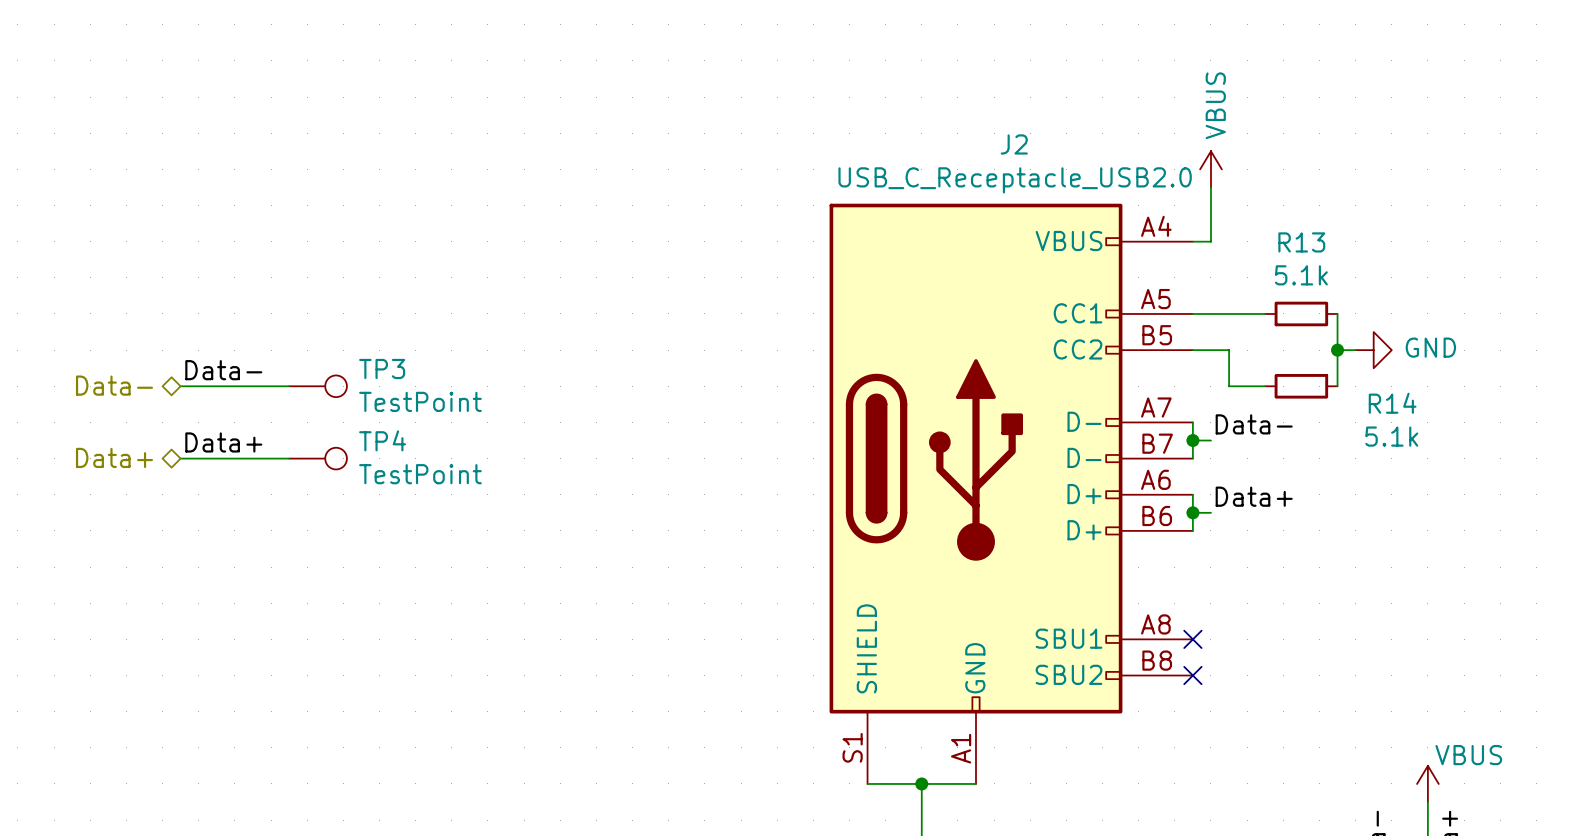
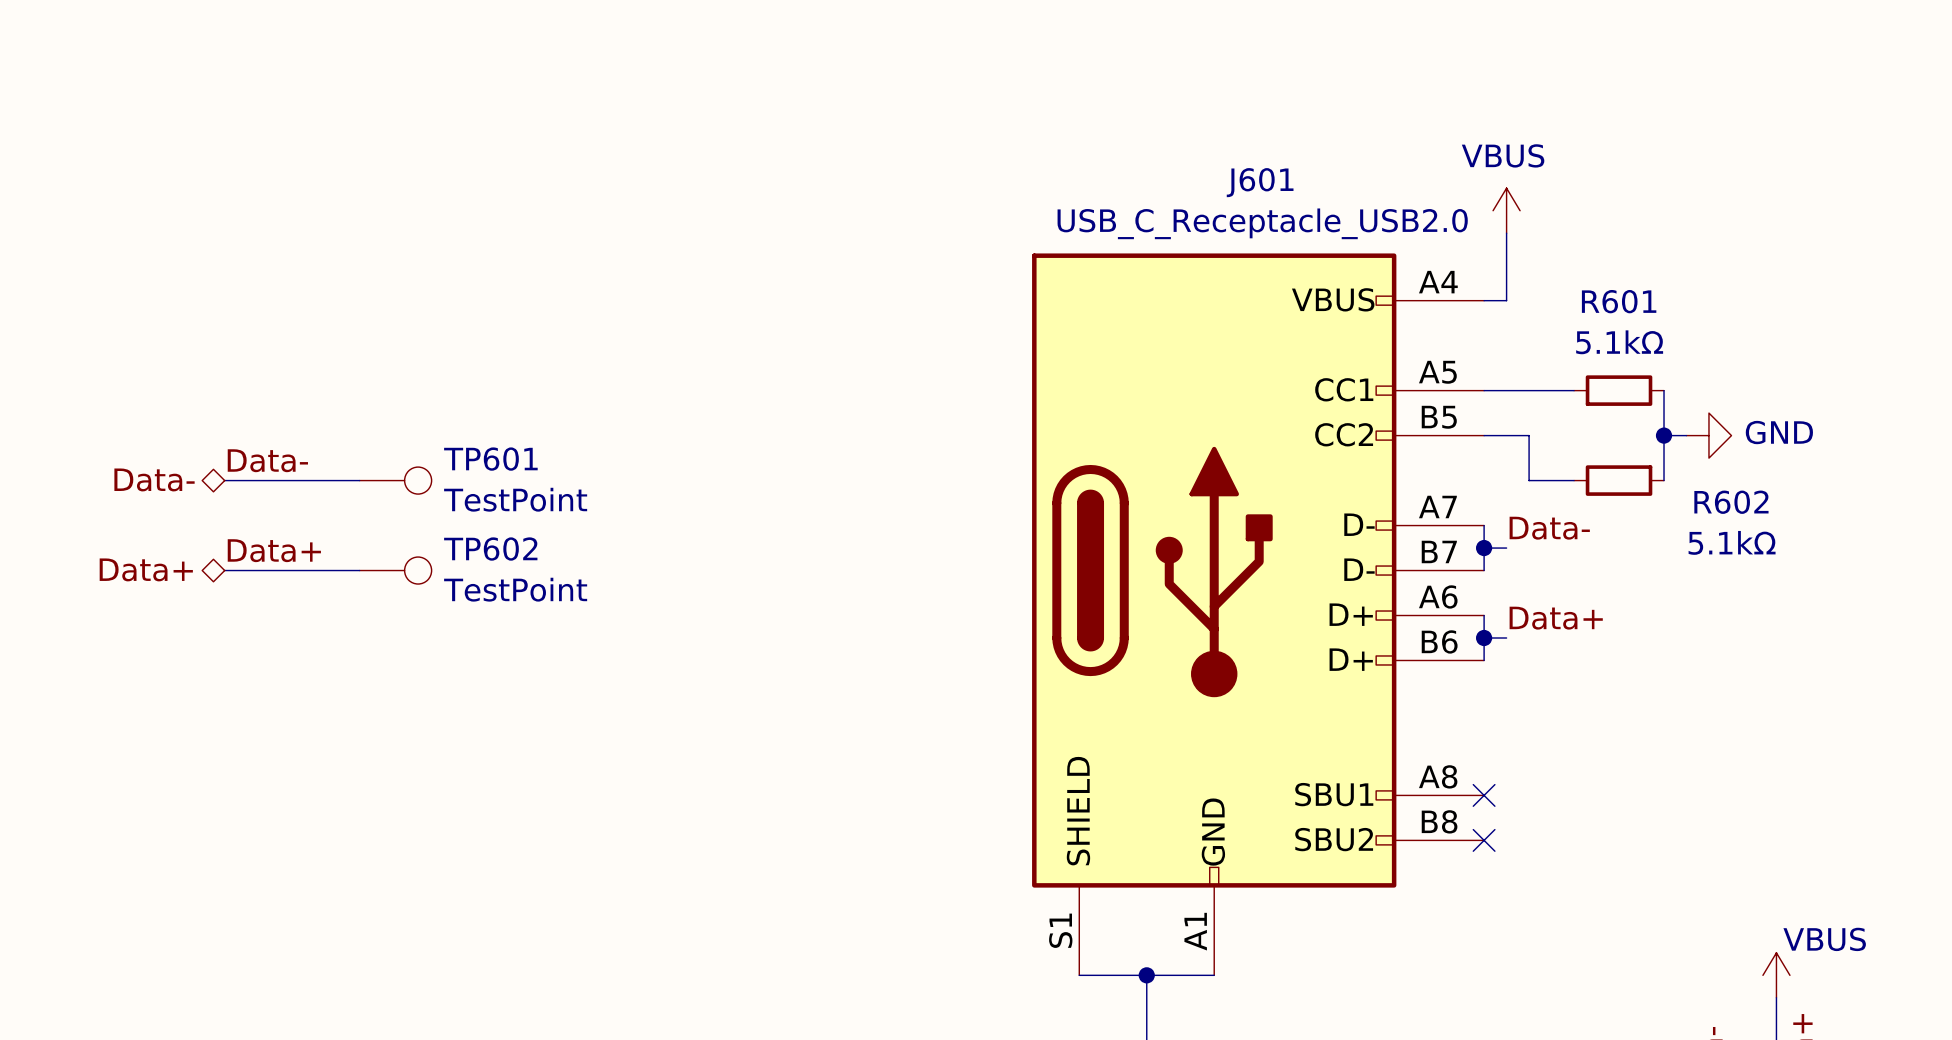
power symbol text rotation: 0° (1215, 105) -> 90° clockwise (1503, 155)
J2 name: J2 (1014, 144) -> J601 (1260, 182)
R13 name: R13 (1301, 242) -> R601 (1619, 301)
R13 value: 5.1k (1301, 275) -> 5.1kΩ (1619, 342)
TP3 name: TP3 (382, 368) -> TP601 (490, 459)
R14 name: R14 (1392, 403) -> R602 (1731, 502)
R14 value: 5.1k (1391, 436) -> 5.1kΩ (1732, 542)
TP4 name: TP4 (382, 440) -> TP602 (490, 549)

